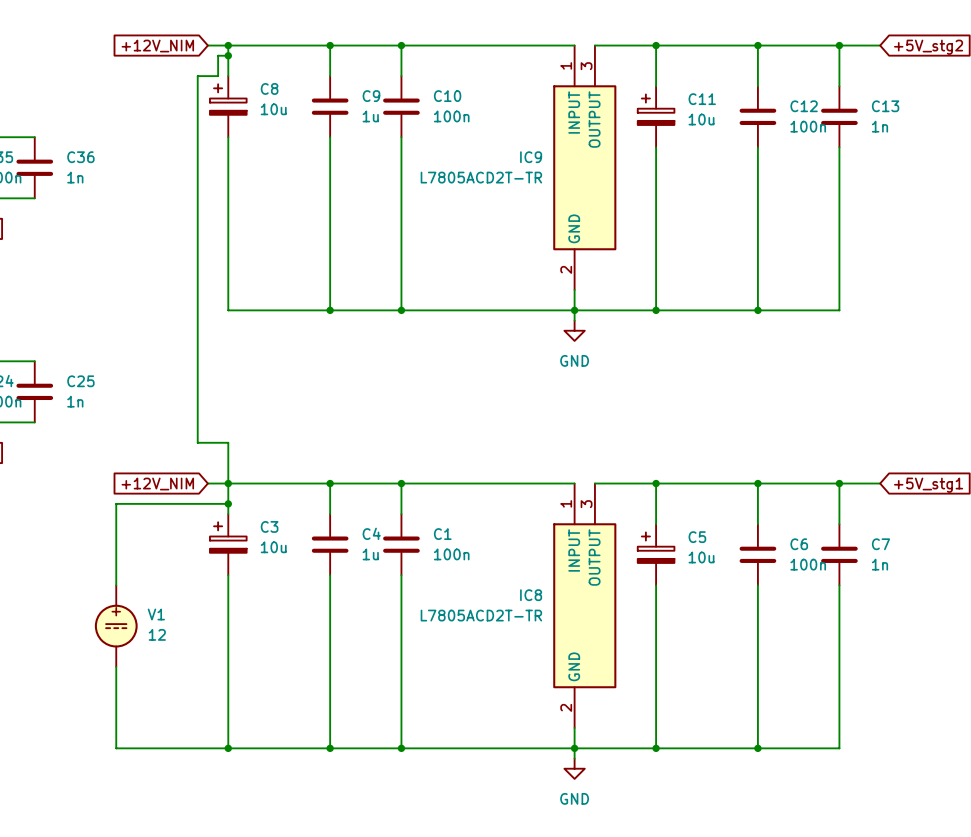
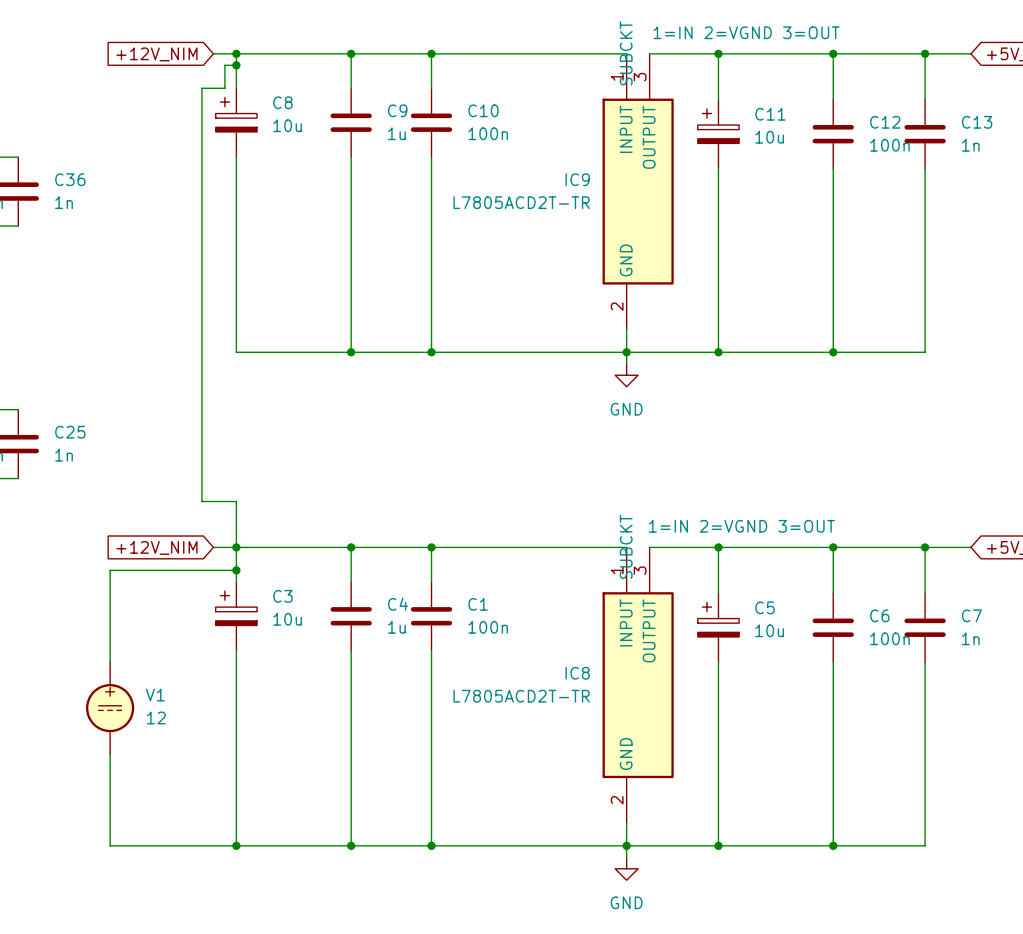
IC9 text: none -> 1=IN 2=VGND 3=OUT (746, 32)
IC9 text: none -> SUBCKT (626, 53)
IC8 text: none -> 1=IN 2=VGND 3=OUT (741, 526)
IC8 text: none -> SUBCKT (626, 546)

